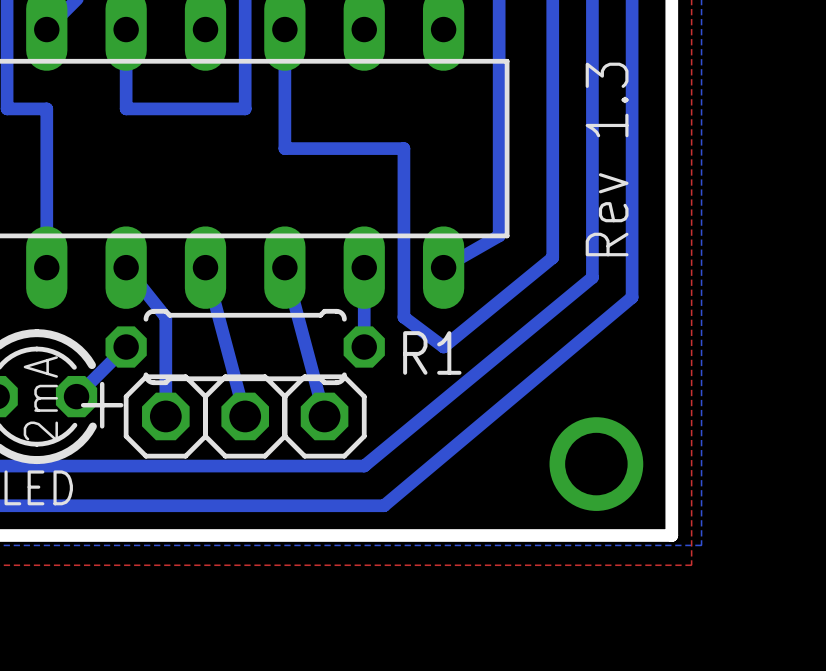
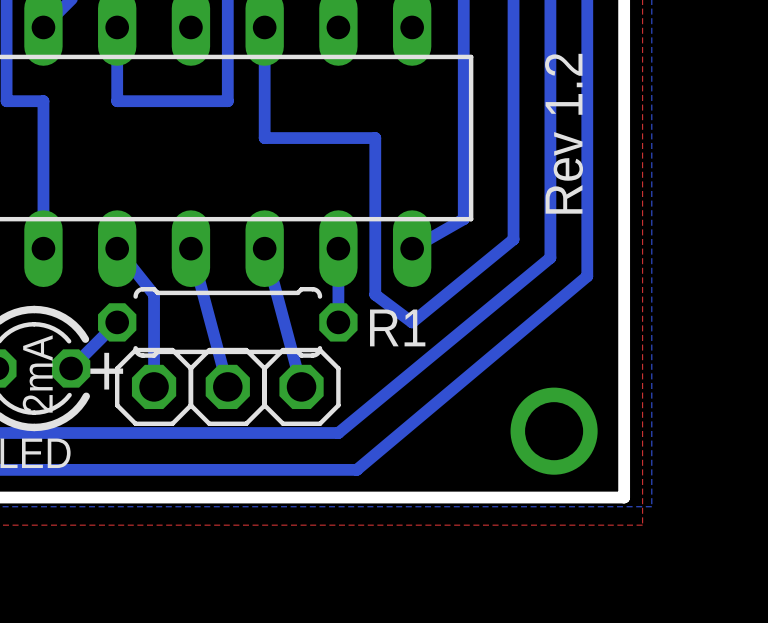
text: Rev 1.3 (607, 159) -> Rev 1.2 (564, 133)

